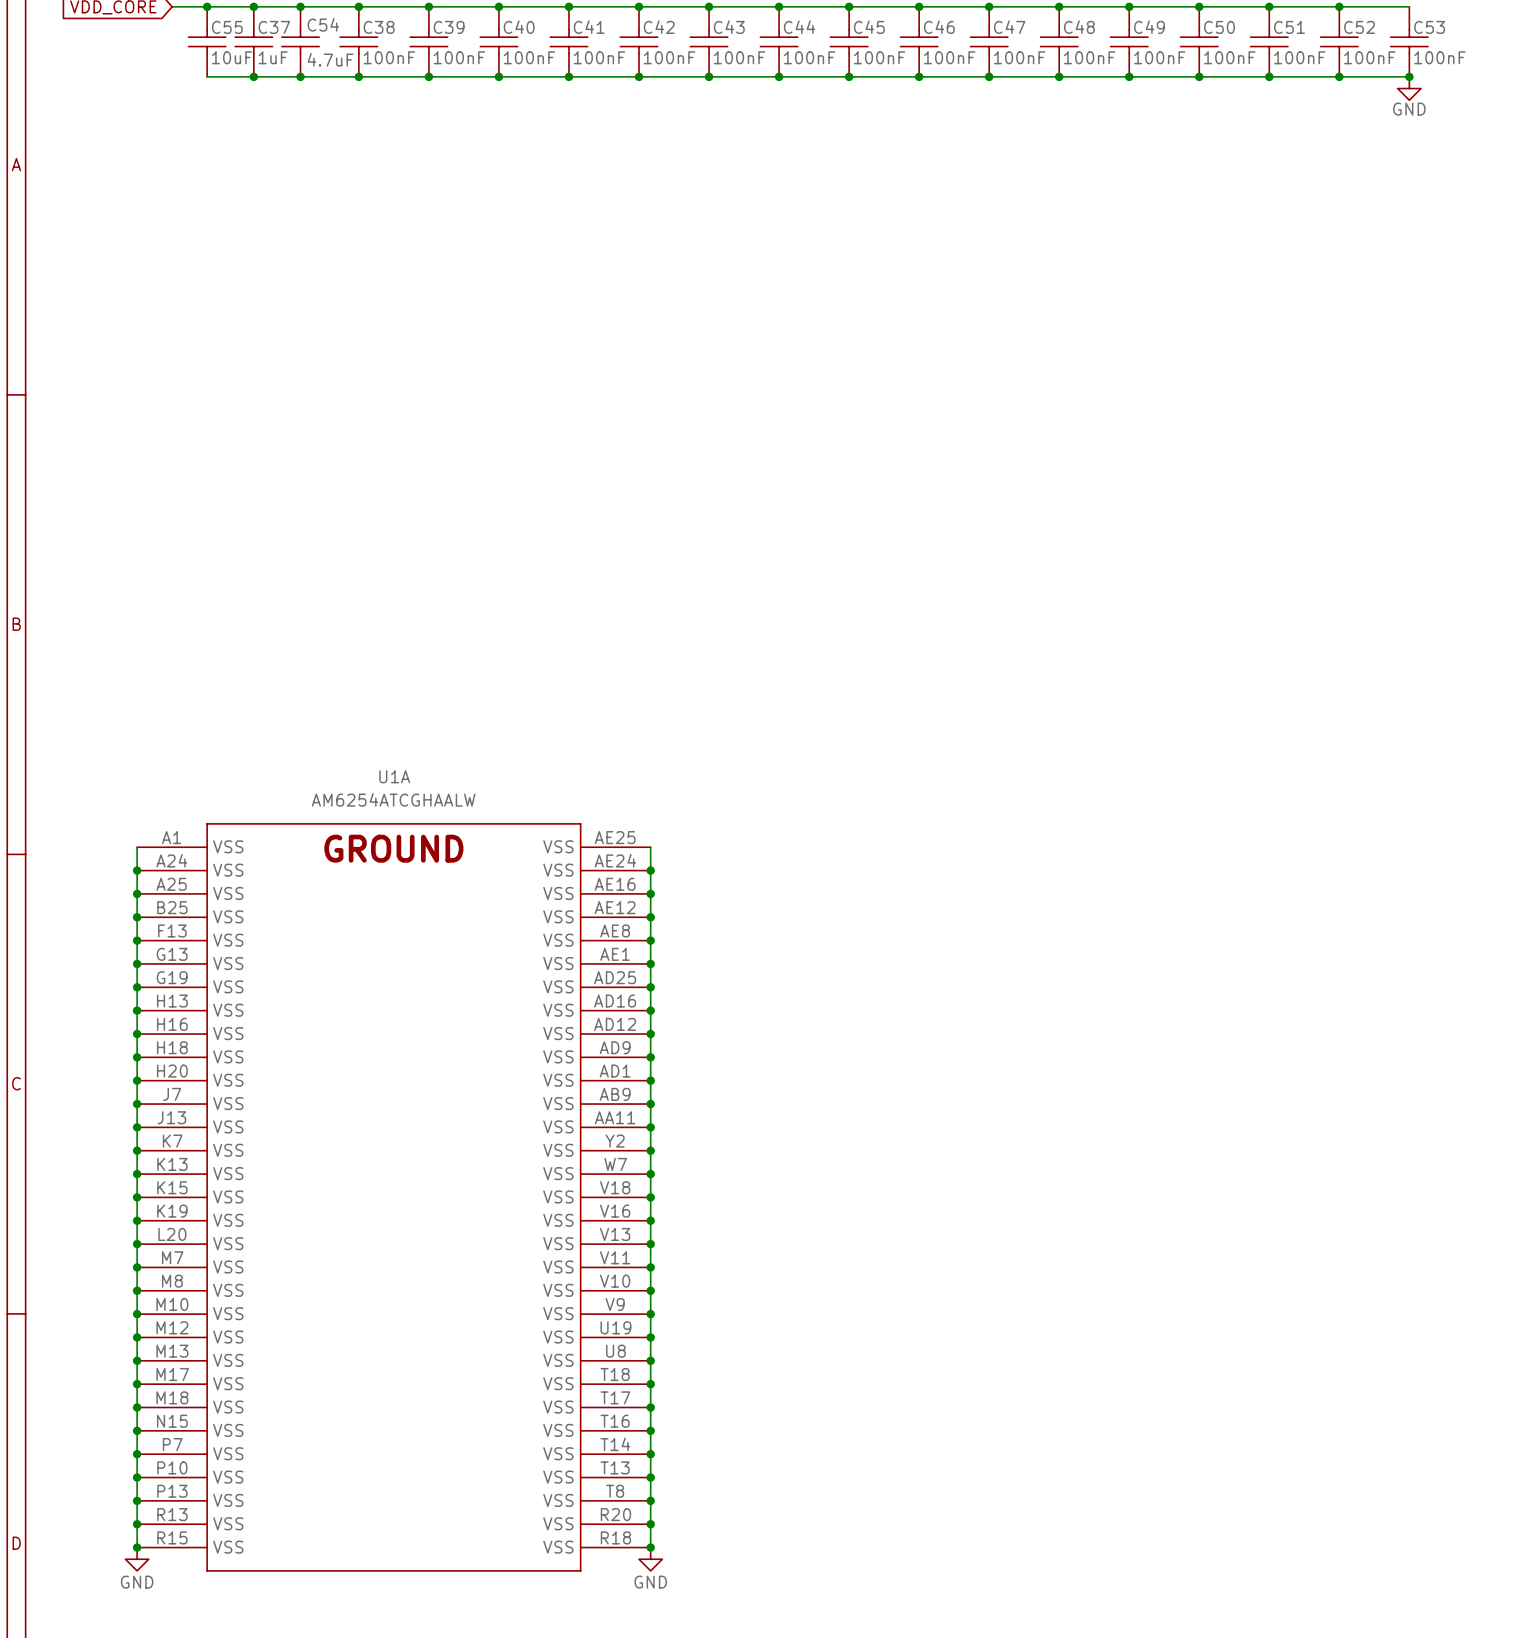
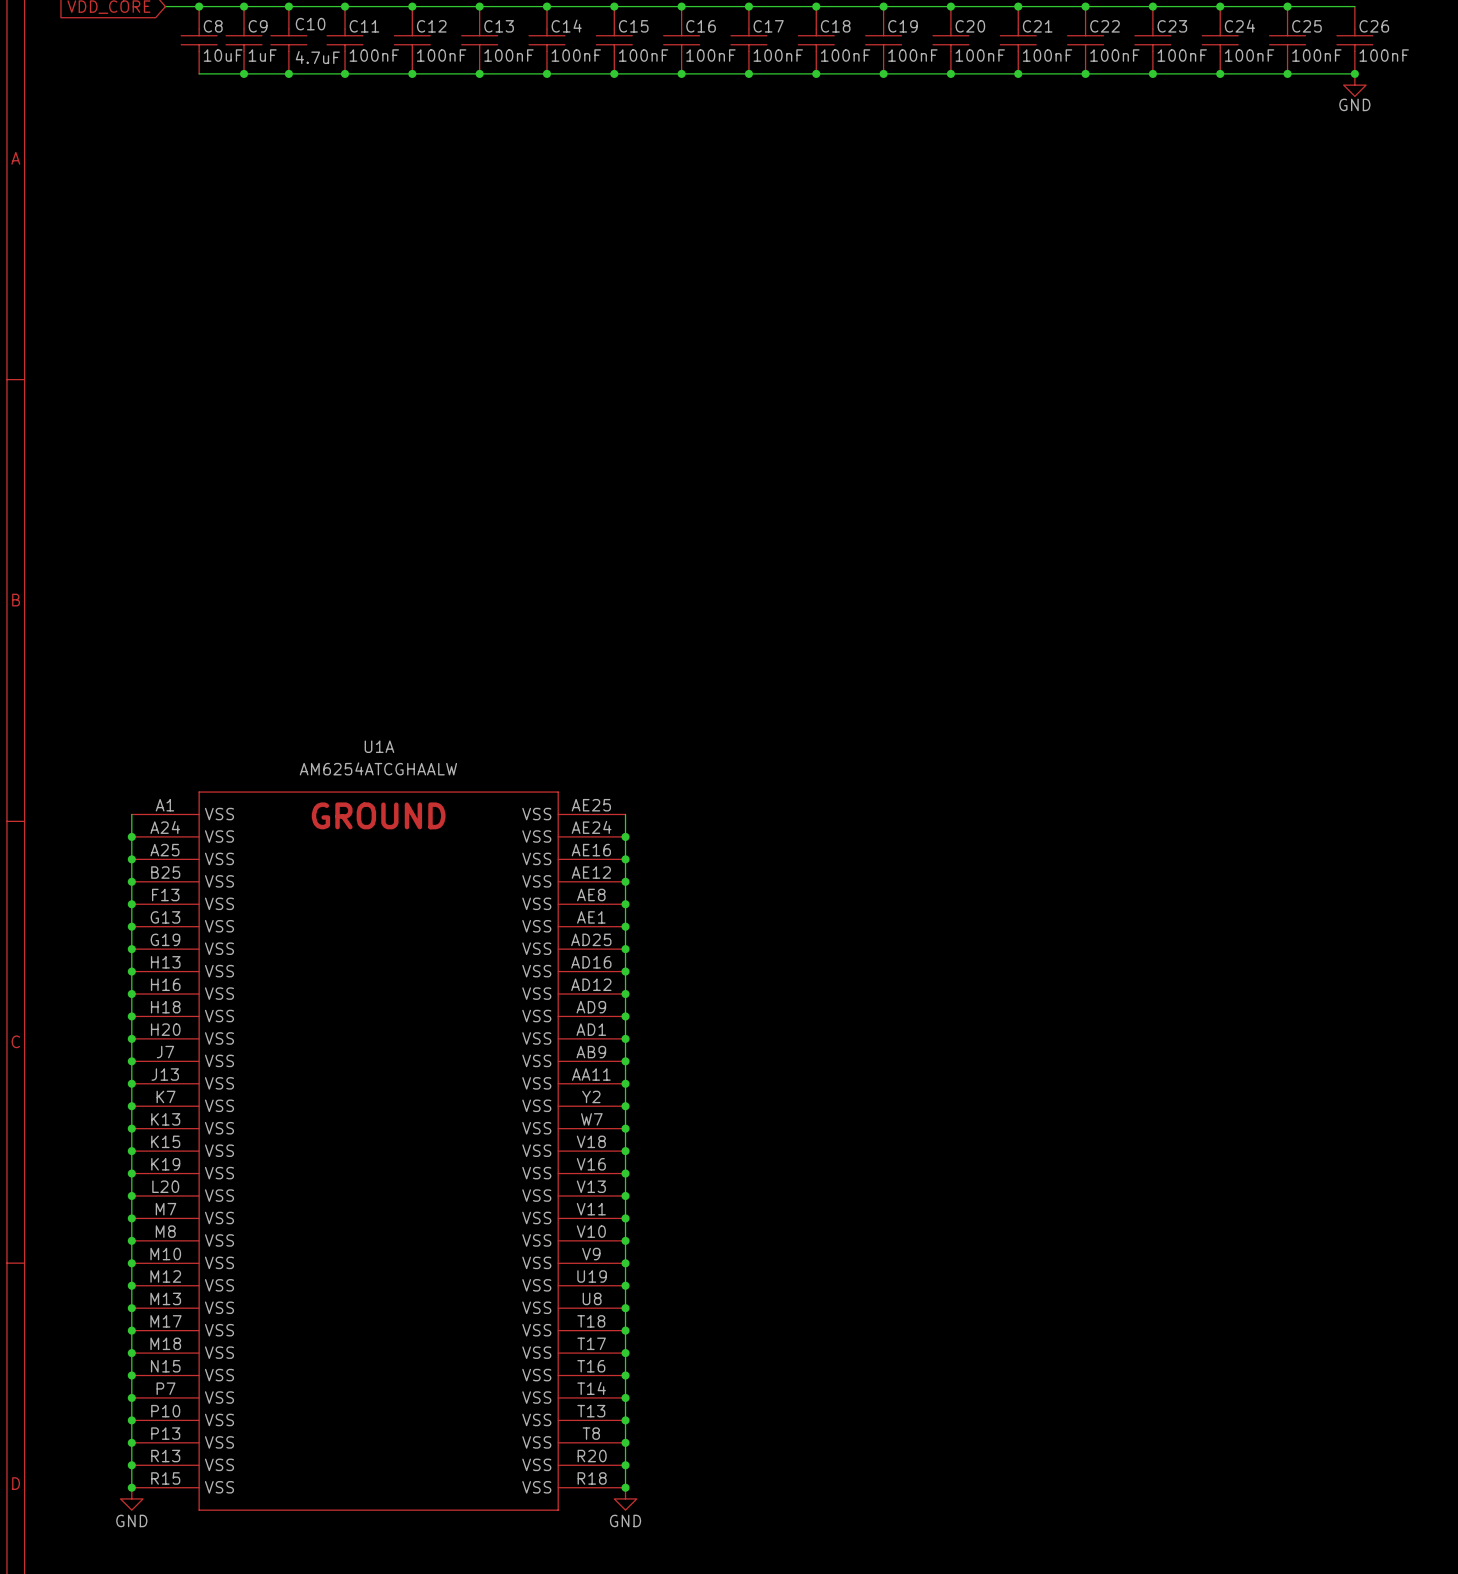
C54 name: C54 (323, 24) -> C10 (310, 24)
C55 name: C55 (227, 27) -> C8 (213, 26)
C37 name: C37 (274, 27) -> C9 (258, 26)
C38 name: C38 (379, 27) -> C11 (364, 26)
C39 name: C39 (449, 27) -> C12 (431, 26)
C40 name: C40 (519, 27) -> C13 (499, 26)
C41 name: C41 (589, 27) -> C14 (566, 26)
C42 name: C42 (659, 27) -> C15 (633, 26)
C43 name: C43 (729, 27) -> C16 (701, 26)
C44 name: C44 (799, 27) -> C17 (768, 26)
C45 name: C45 (869, 27) -> C18 (835, 26)
C46 name: C46 (939, 27) -> C19 (903, 26)
C47 name: C47 (1009, 27) -> C20 (970, 26)
C48 name: C48 (1079, 27) -> C21 (1037, 26)
C49 name: C49 (1149, 27) -> C22 (1105, 26)
C50 name: C50 (1219, 27) -> C23 (1172, 26)
C51 name: C51 (1289, 27) -> C24 (1239, 26)
C52 name: C52 (1359, 27) -> C25 (1306, 26)
C53 name: C53 (1429, 27) -> C26 (1374, 26)

